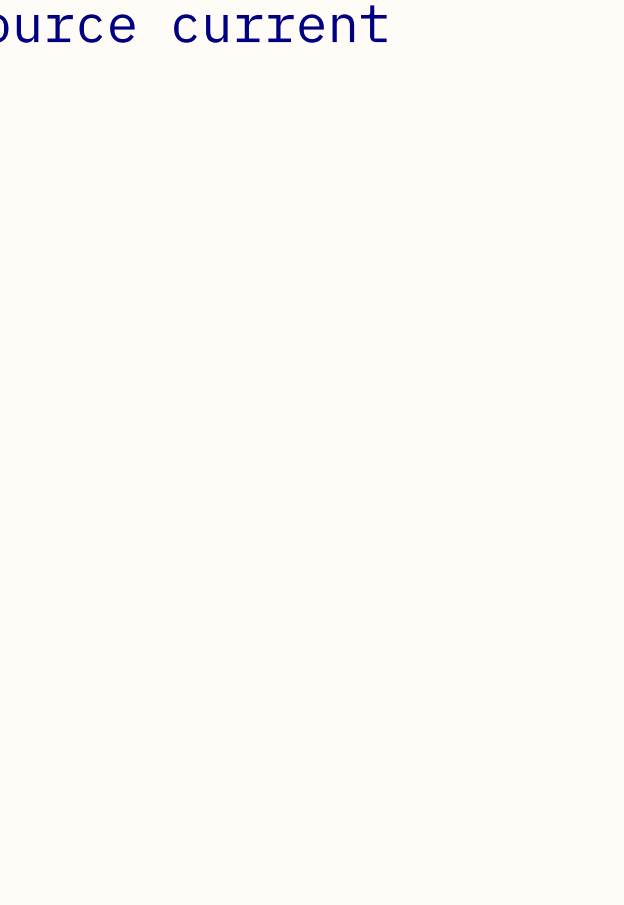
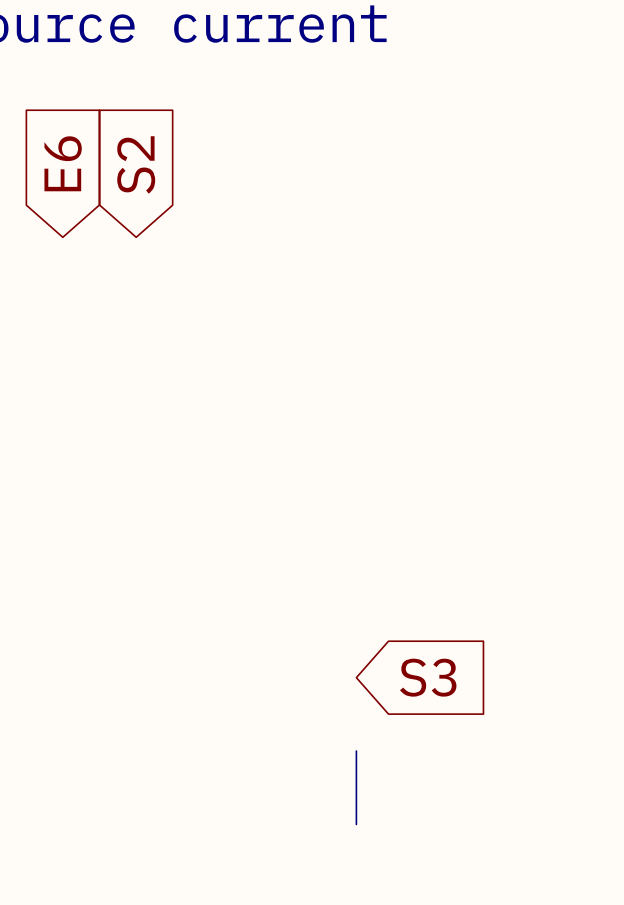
global label: none -> E6 (63, 163)
global label: none -> S2 (136, 164)
global label: none -> S3 (428, 677)
wire: none -> (356, 751) (356, 824)

